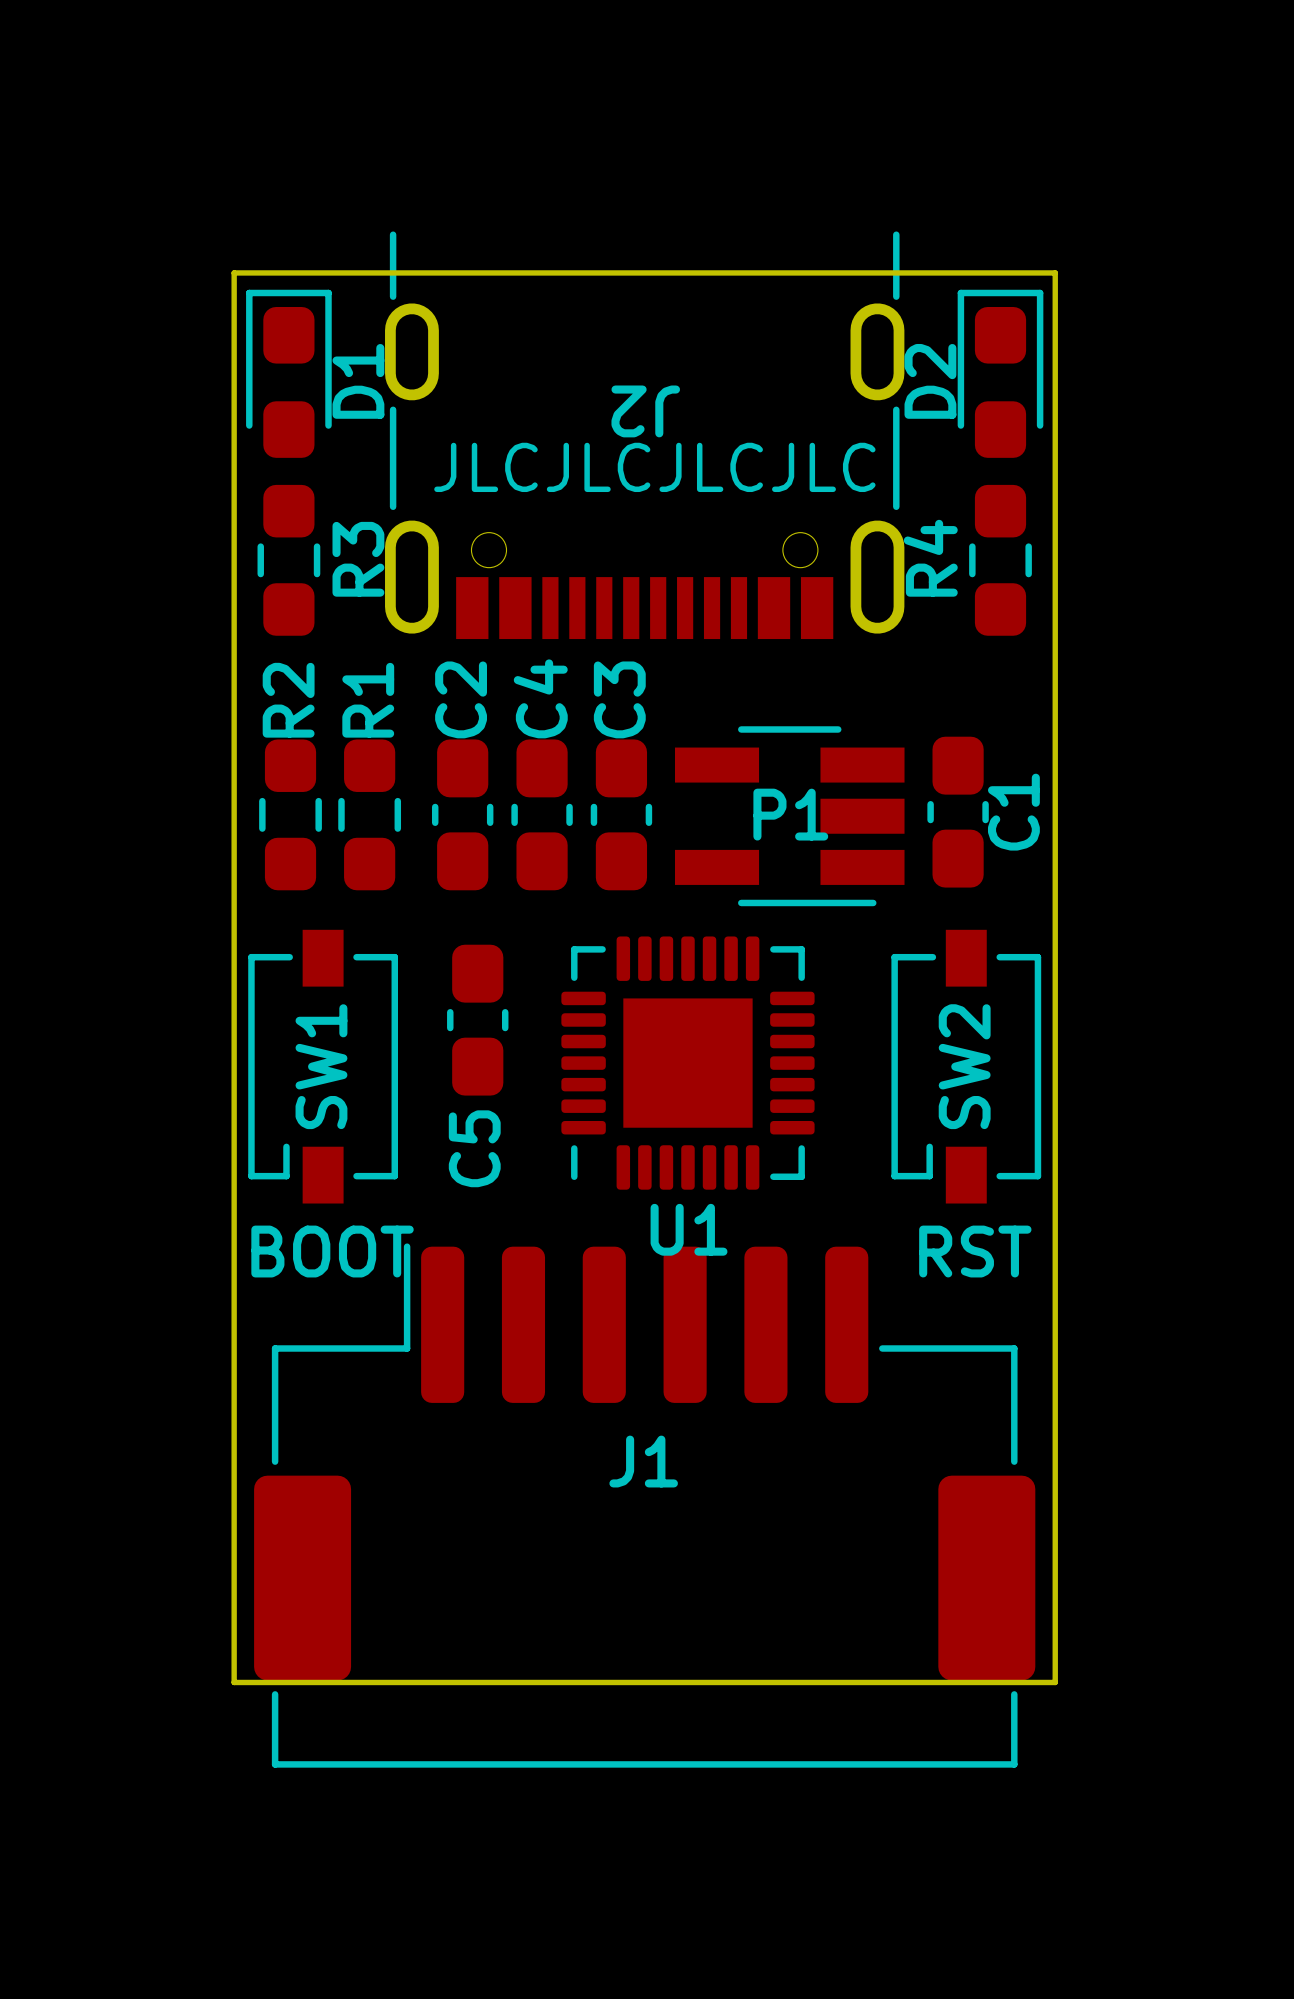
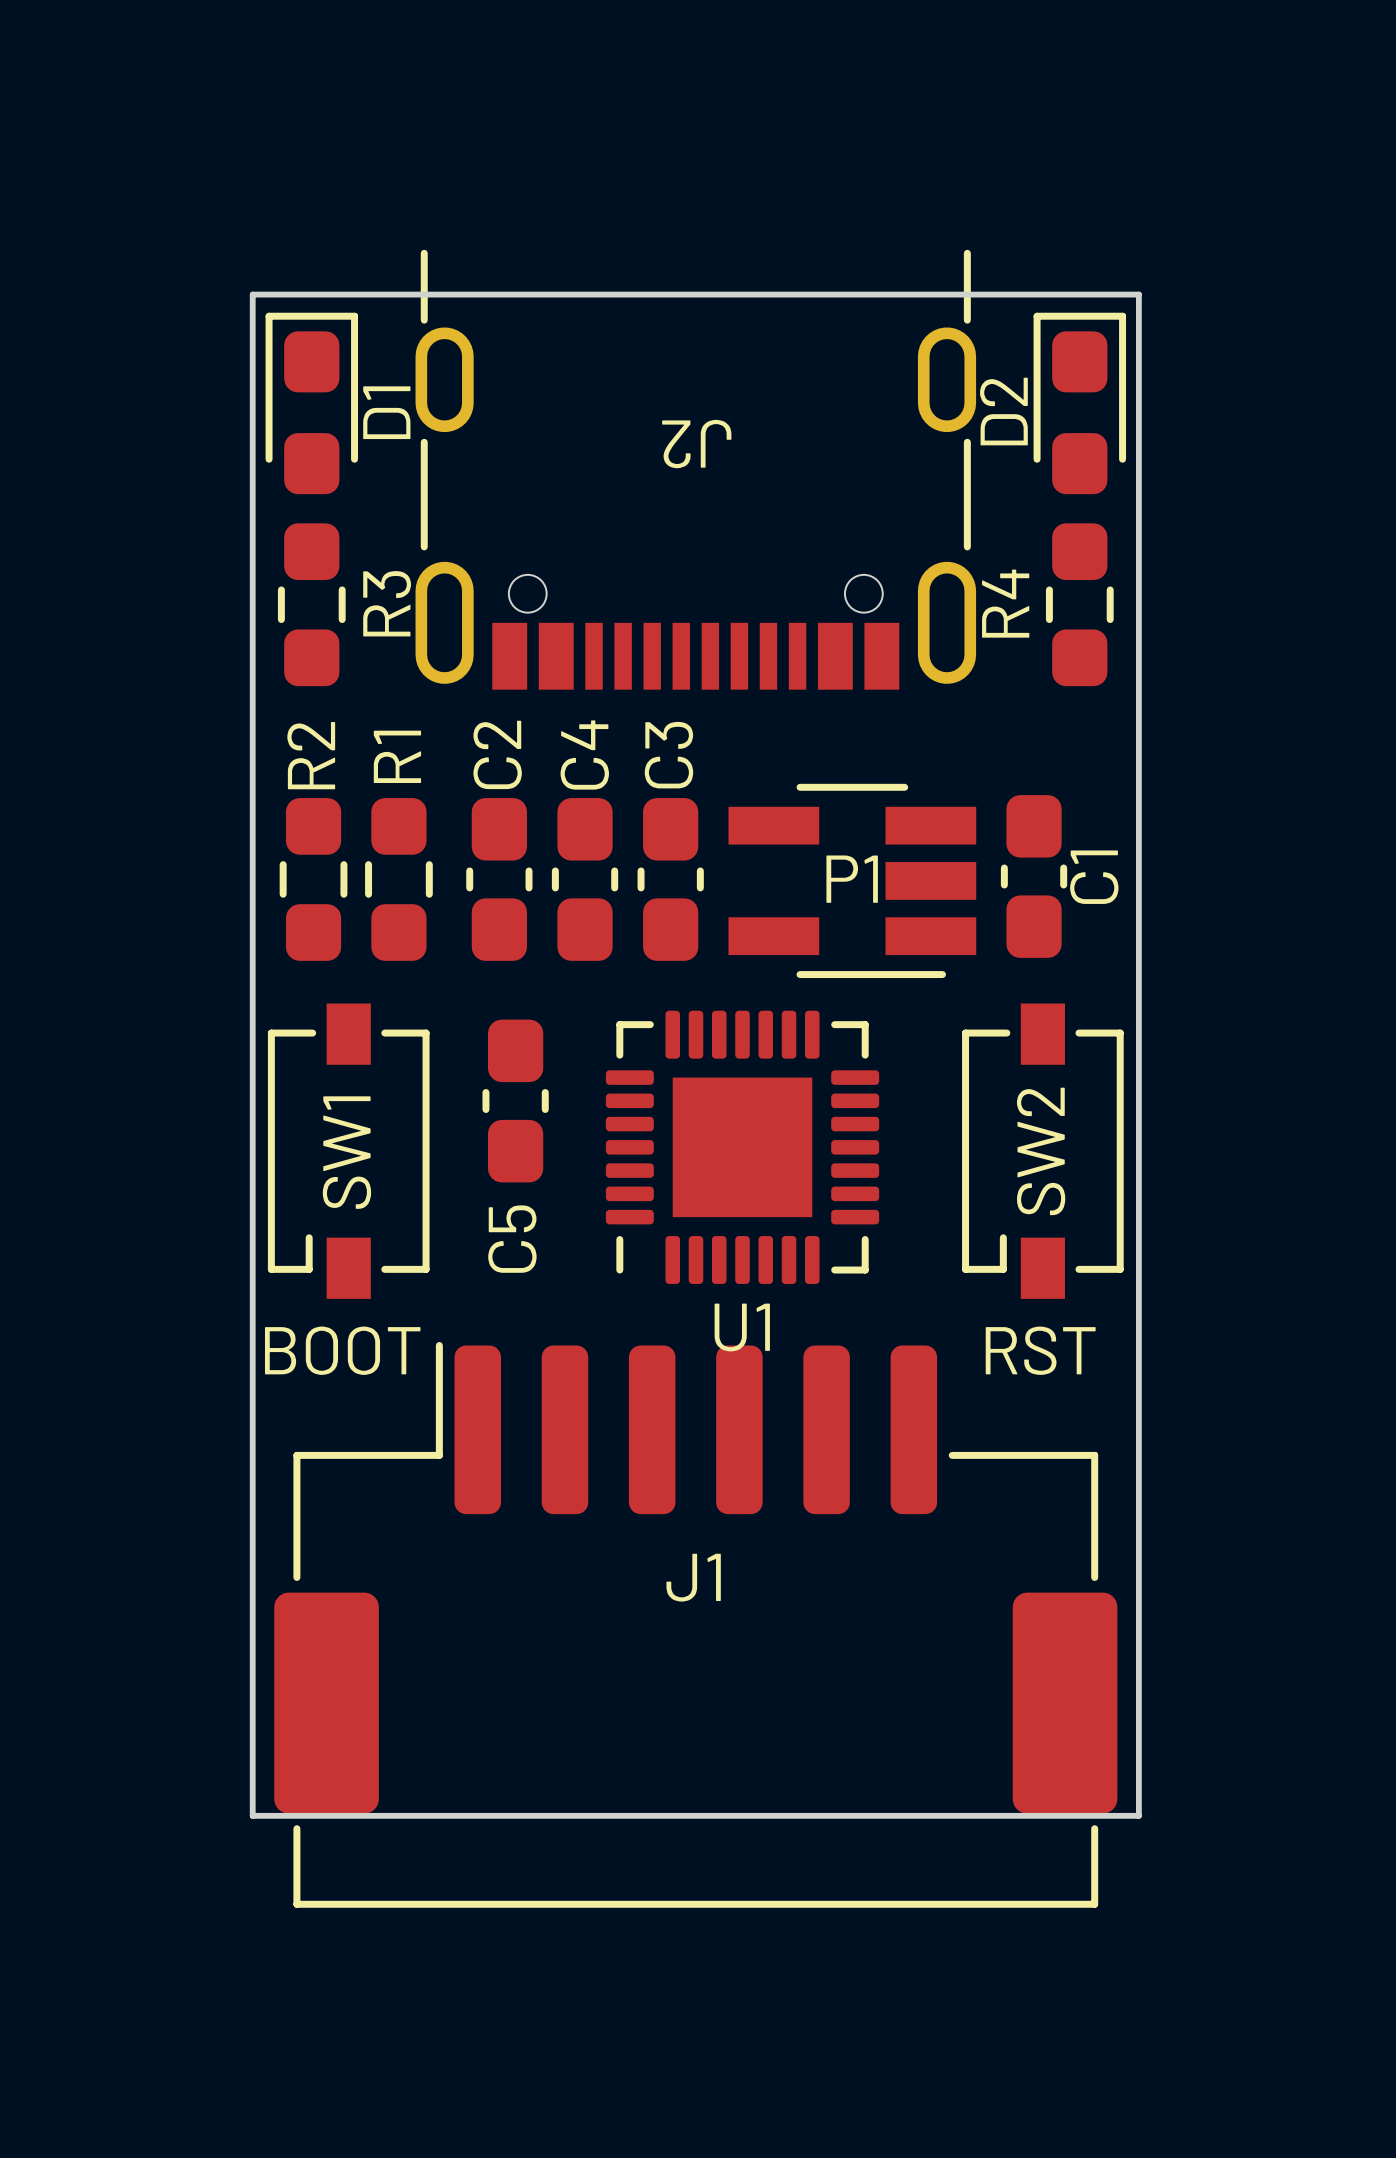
text: JLCJLCJLCJLC (654, 467) -> none

